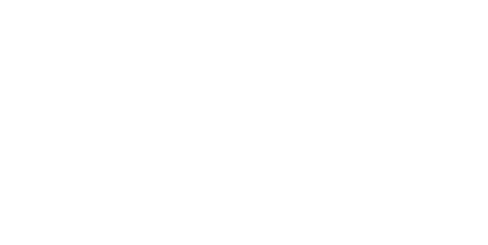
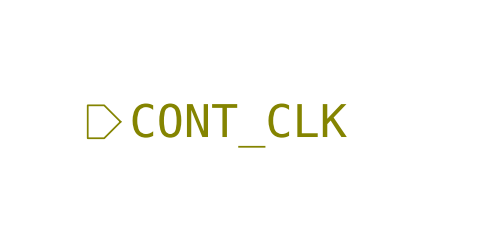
hierarchical label: none -> CONT_CLK (239, 125)

